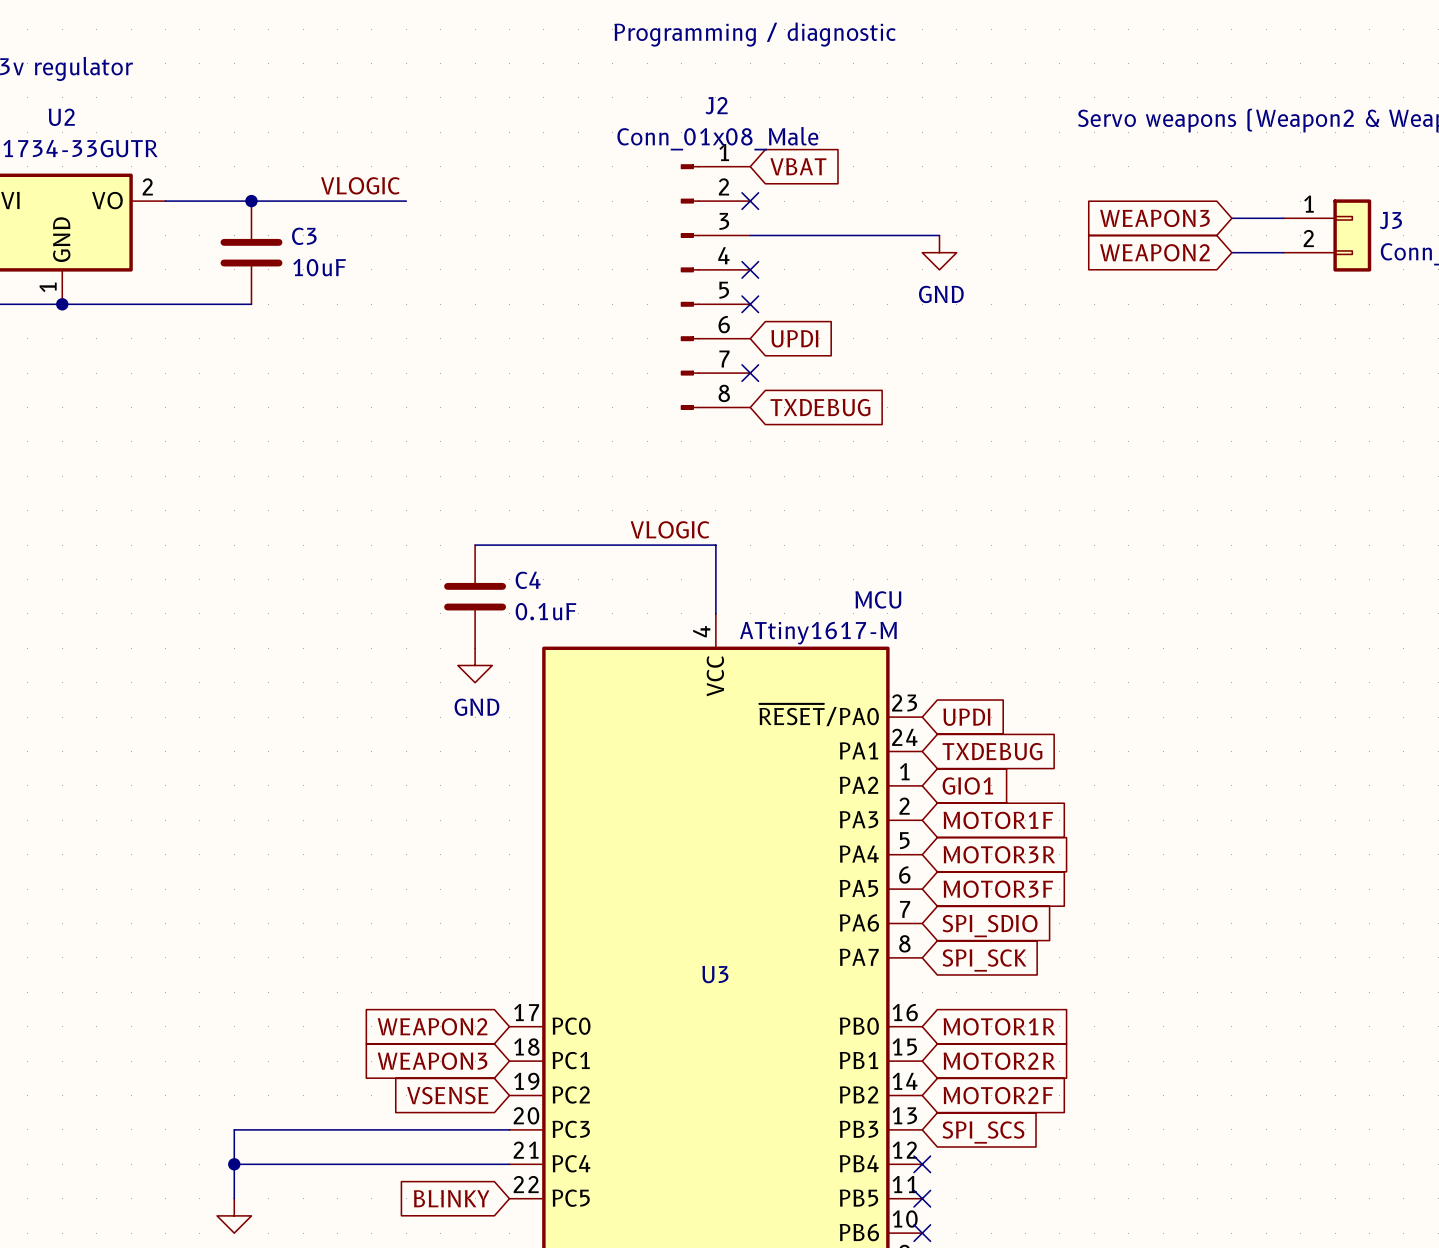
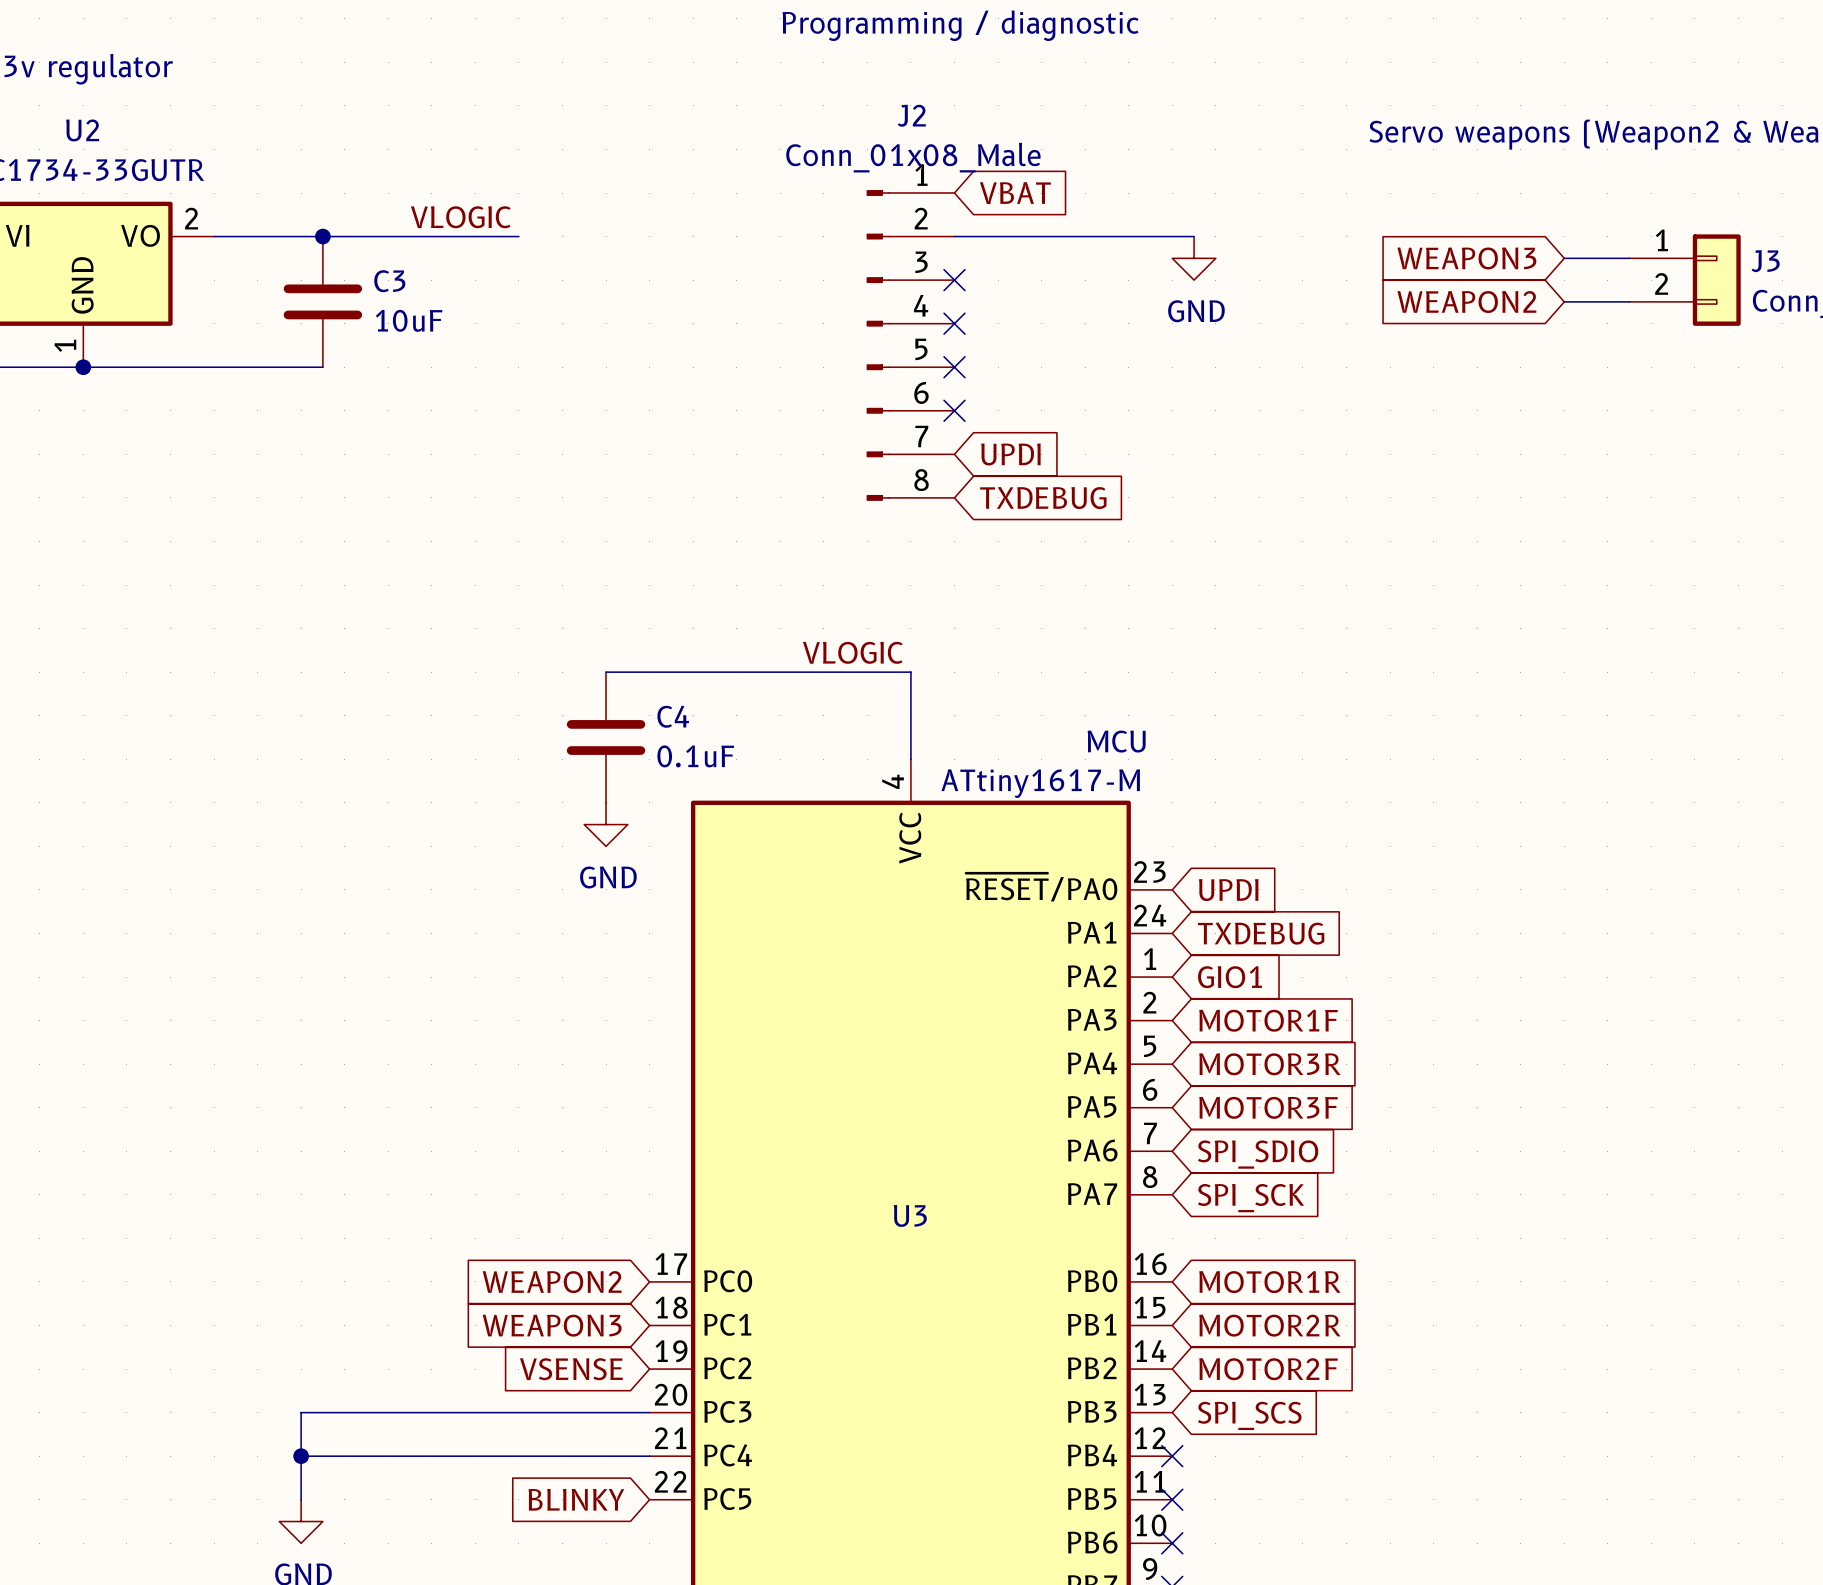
no-connect mark position: (750, 201) -> (954, 280)
wire: (750, 235) (939, 235) -> (954, 236) (1194, 236)
power symbol position: GND (939, 252) -> GND (1194, 258)
global label position: UPDI (794, 338) -> UPDI (1010, 454)
no-connect mark position: (750, 373) -> (954, 410)

